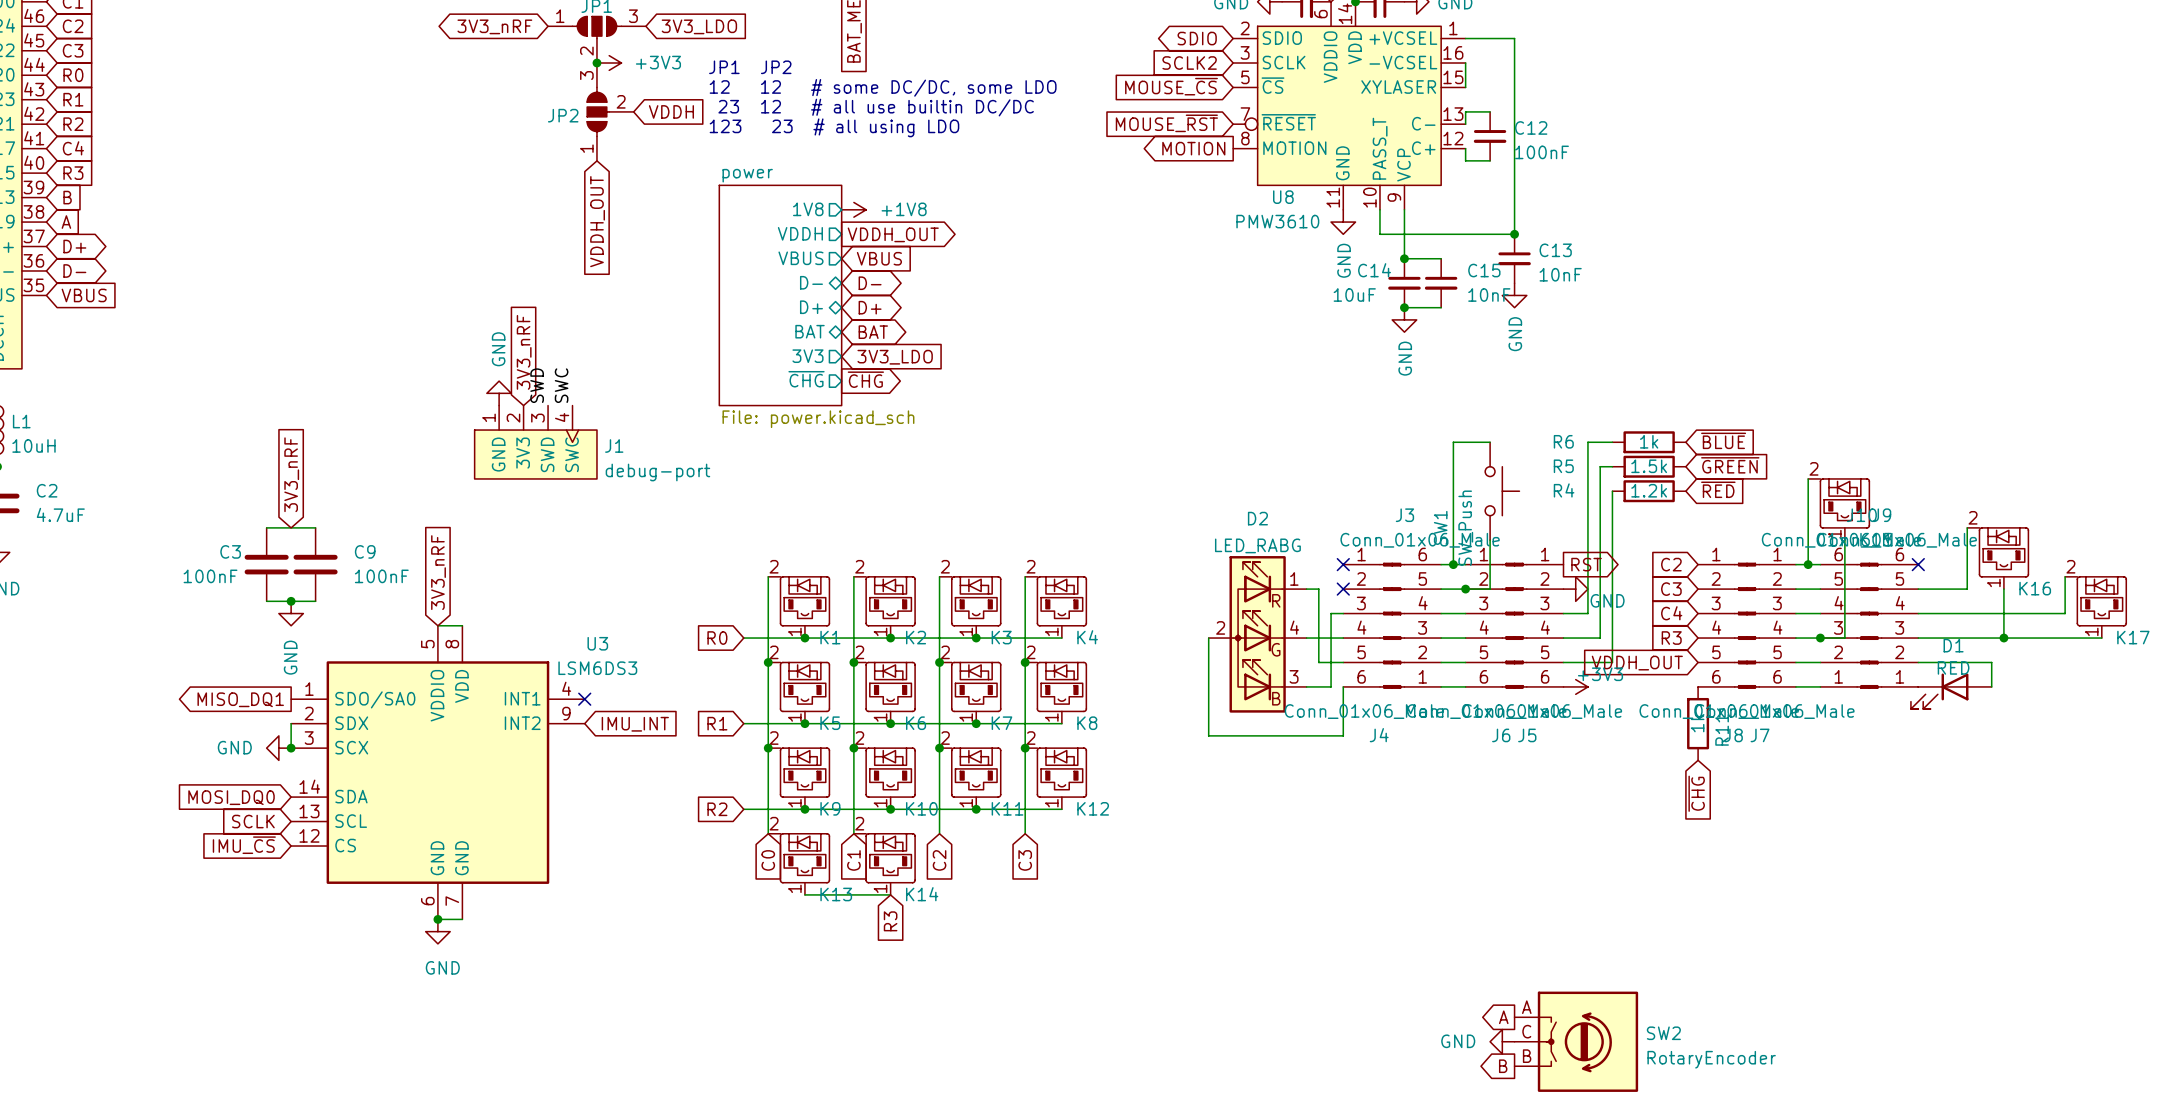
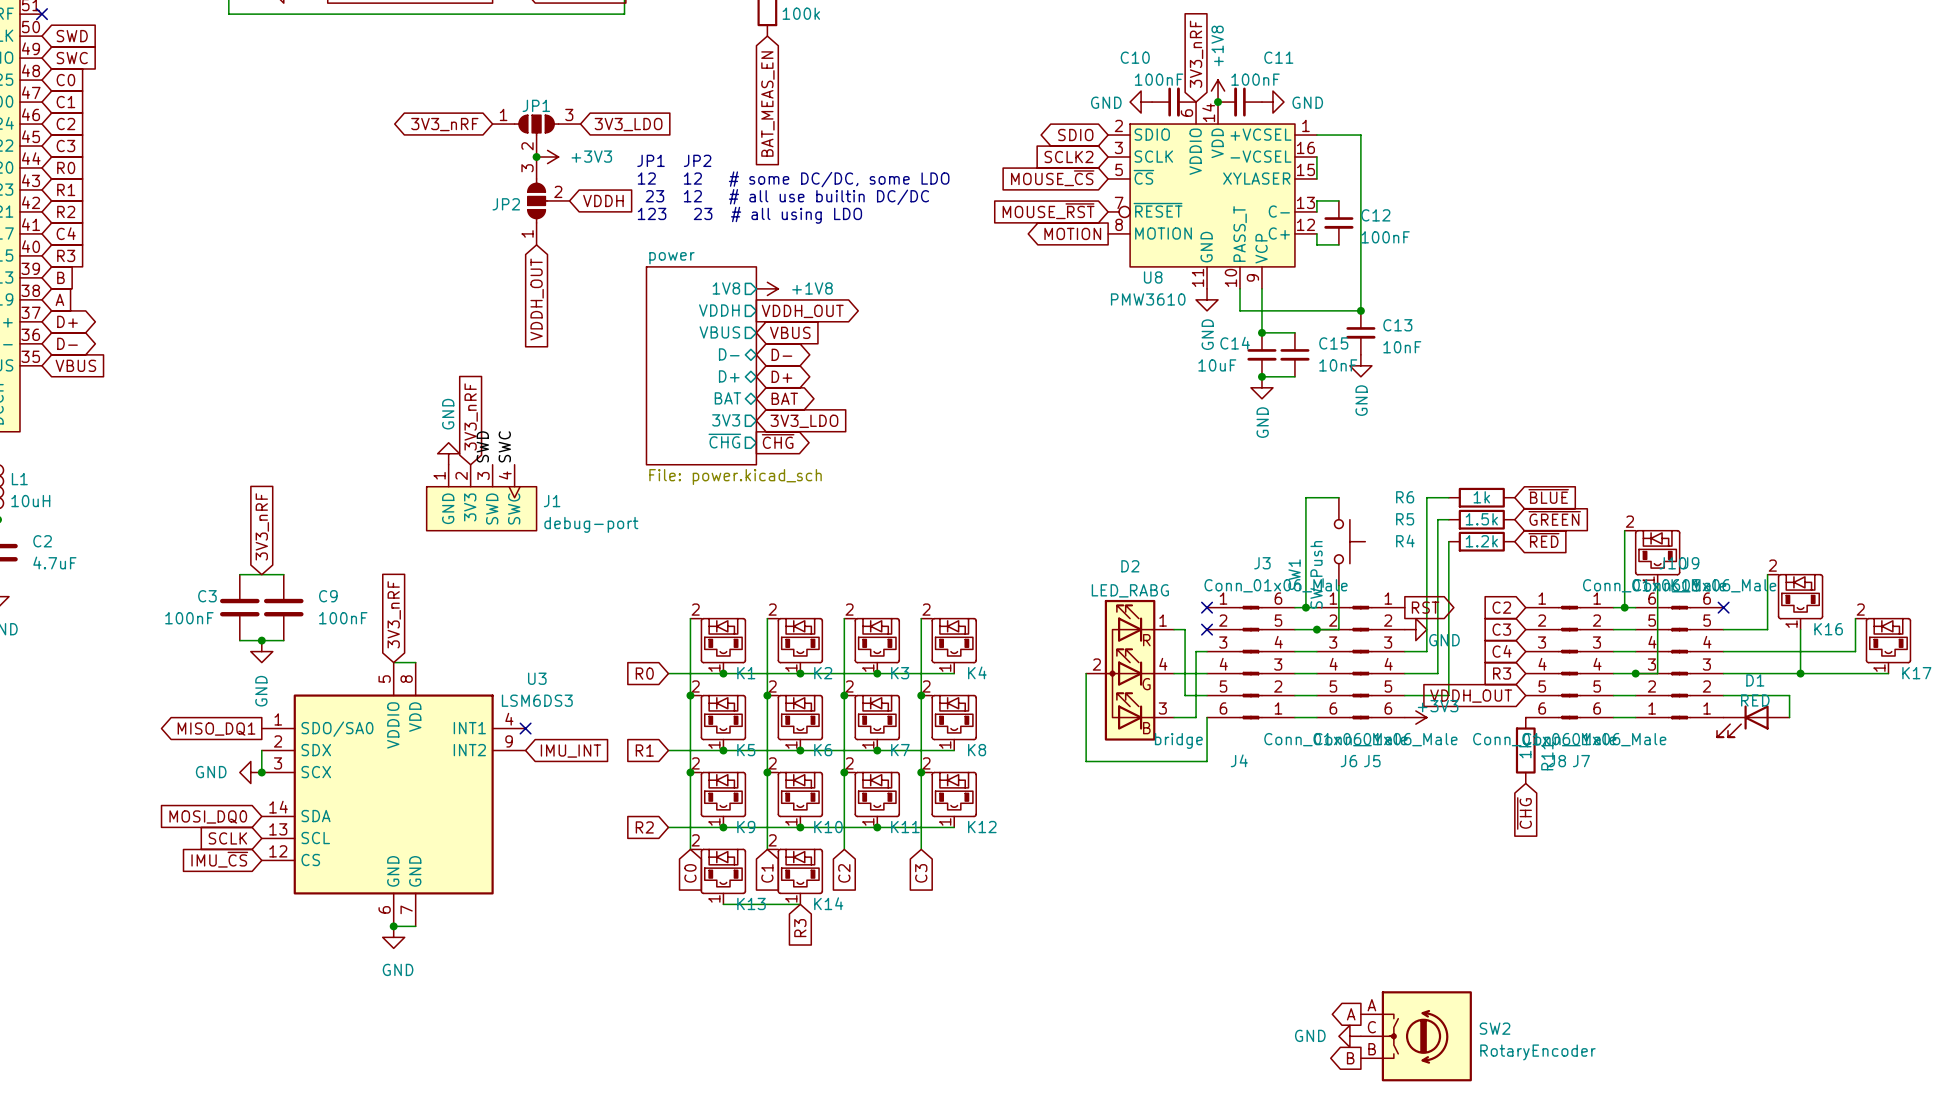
J4 value: Conn_01x06_Male (1364, 711) -> bridge (1178, 740)

